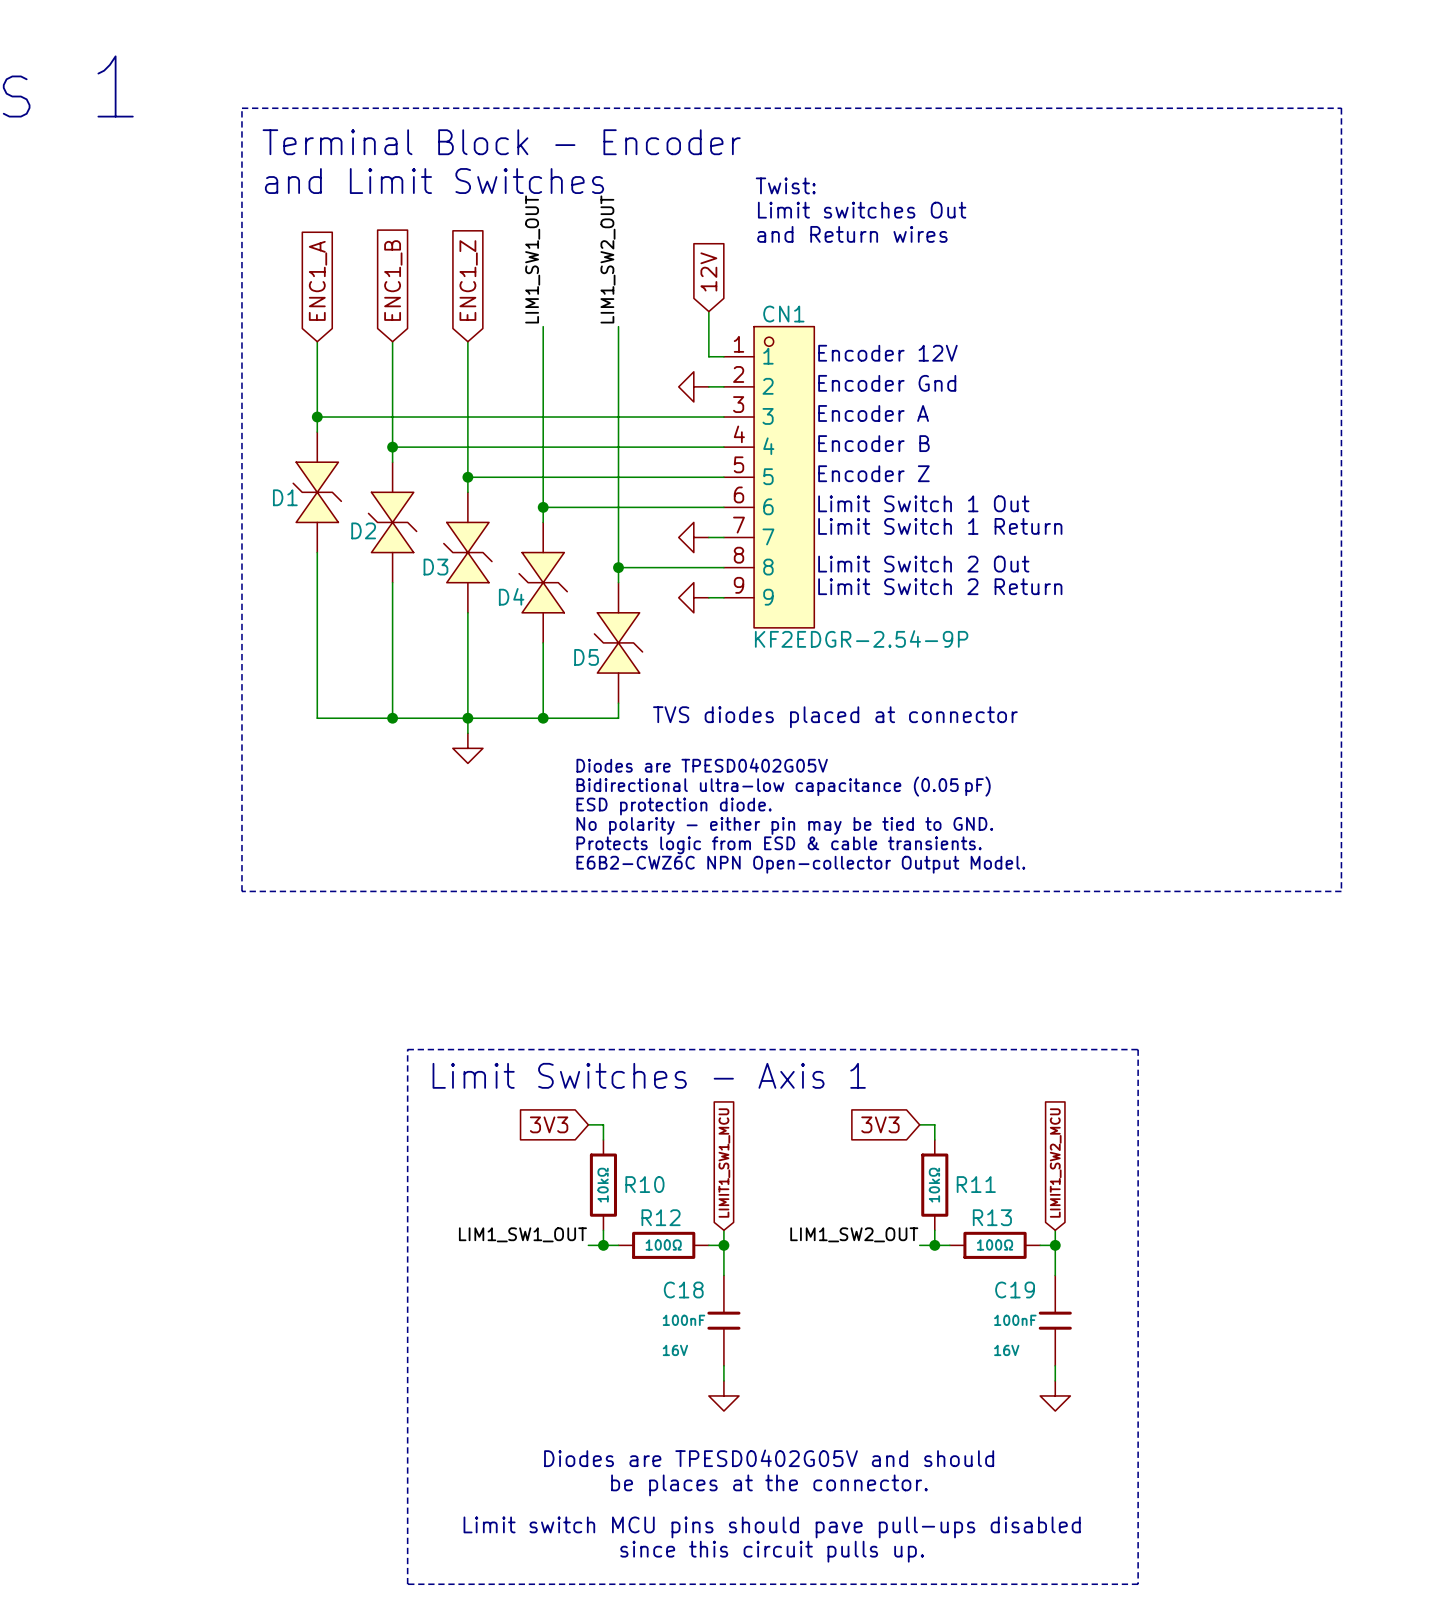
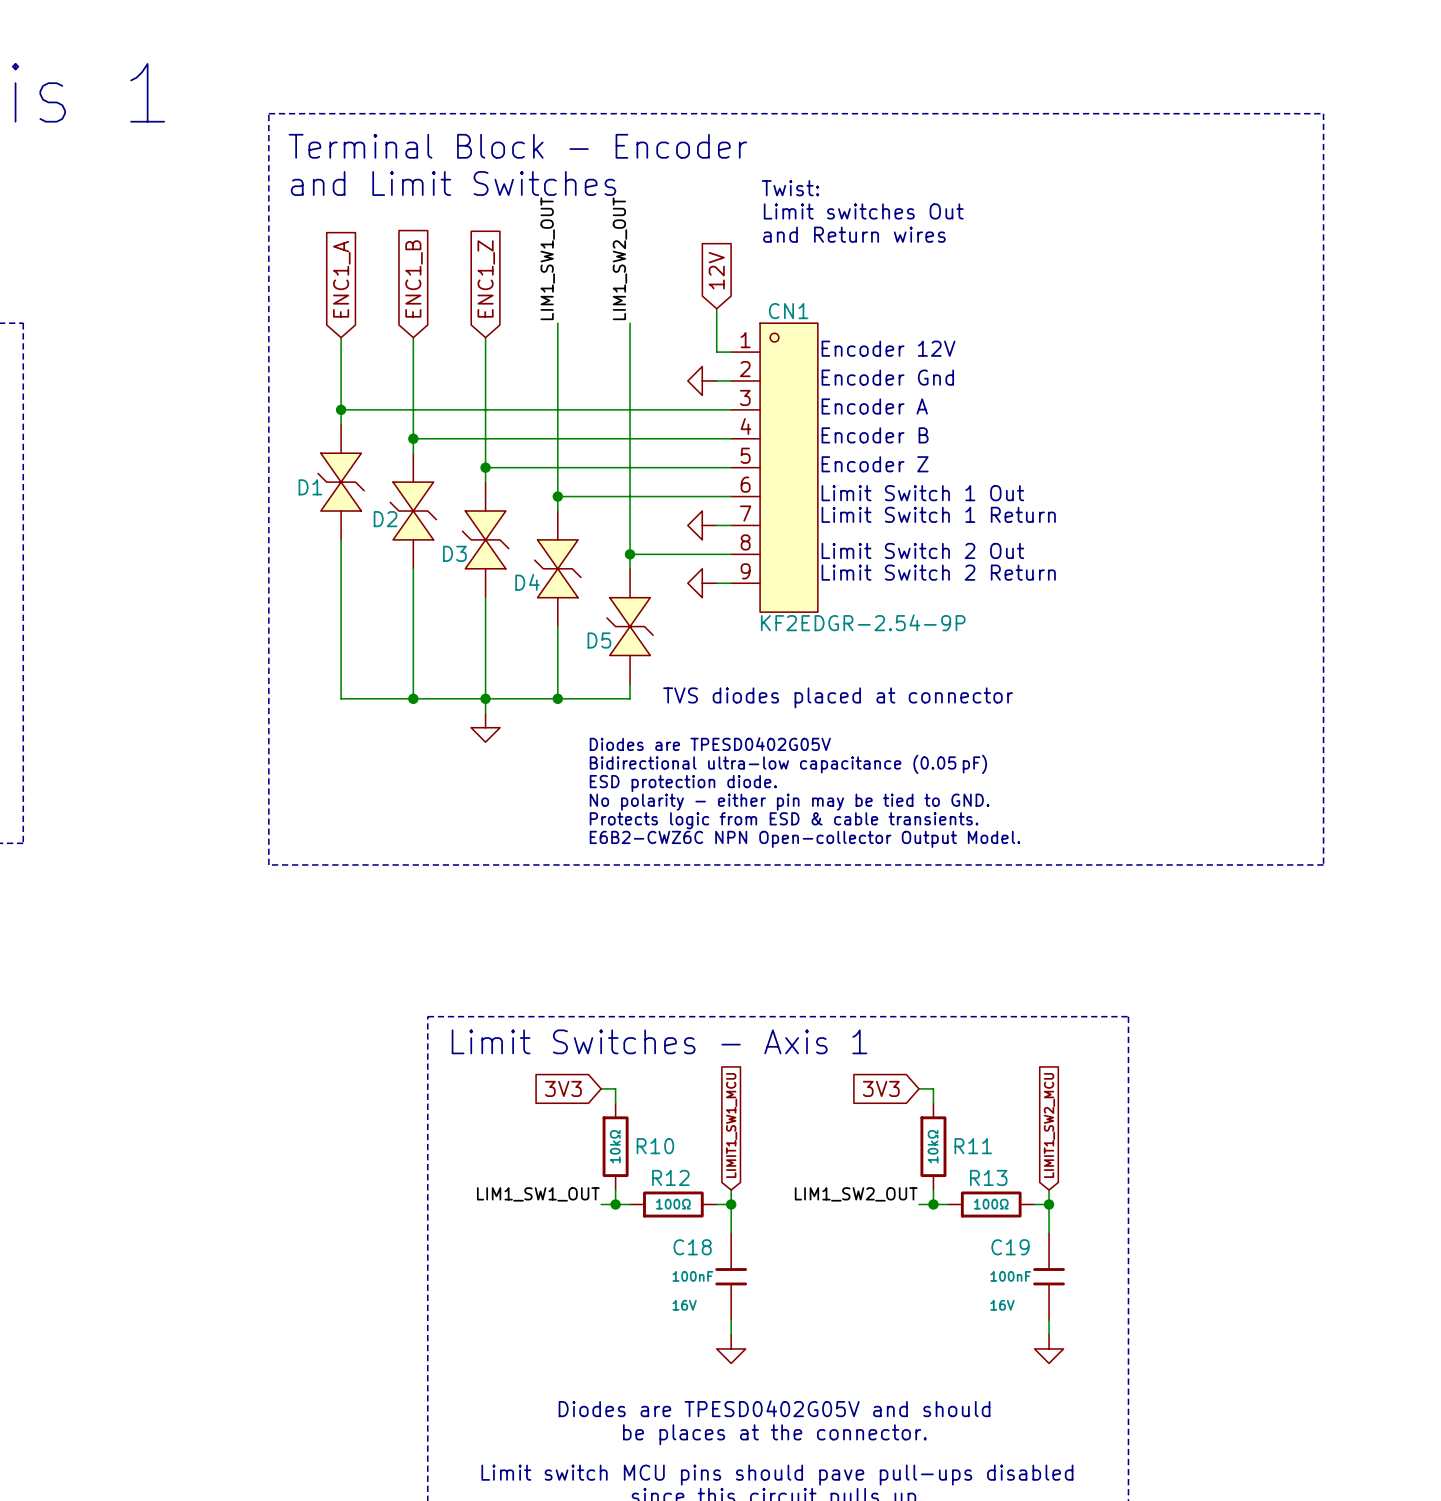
CN1 symbol: [723, 326, 815, 628] -> [731, 323, 818, 613]

